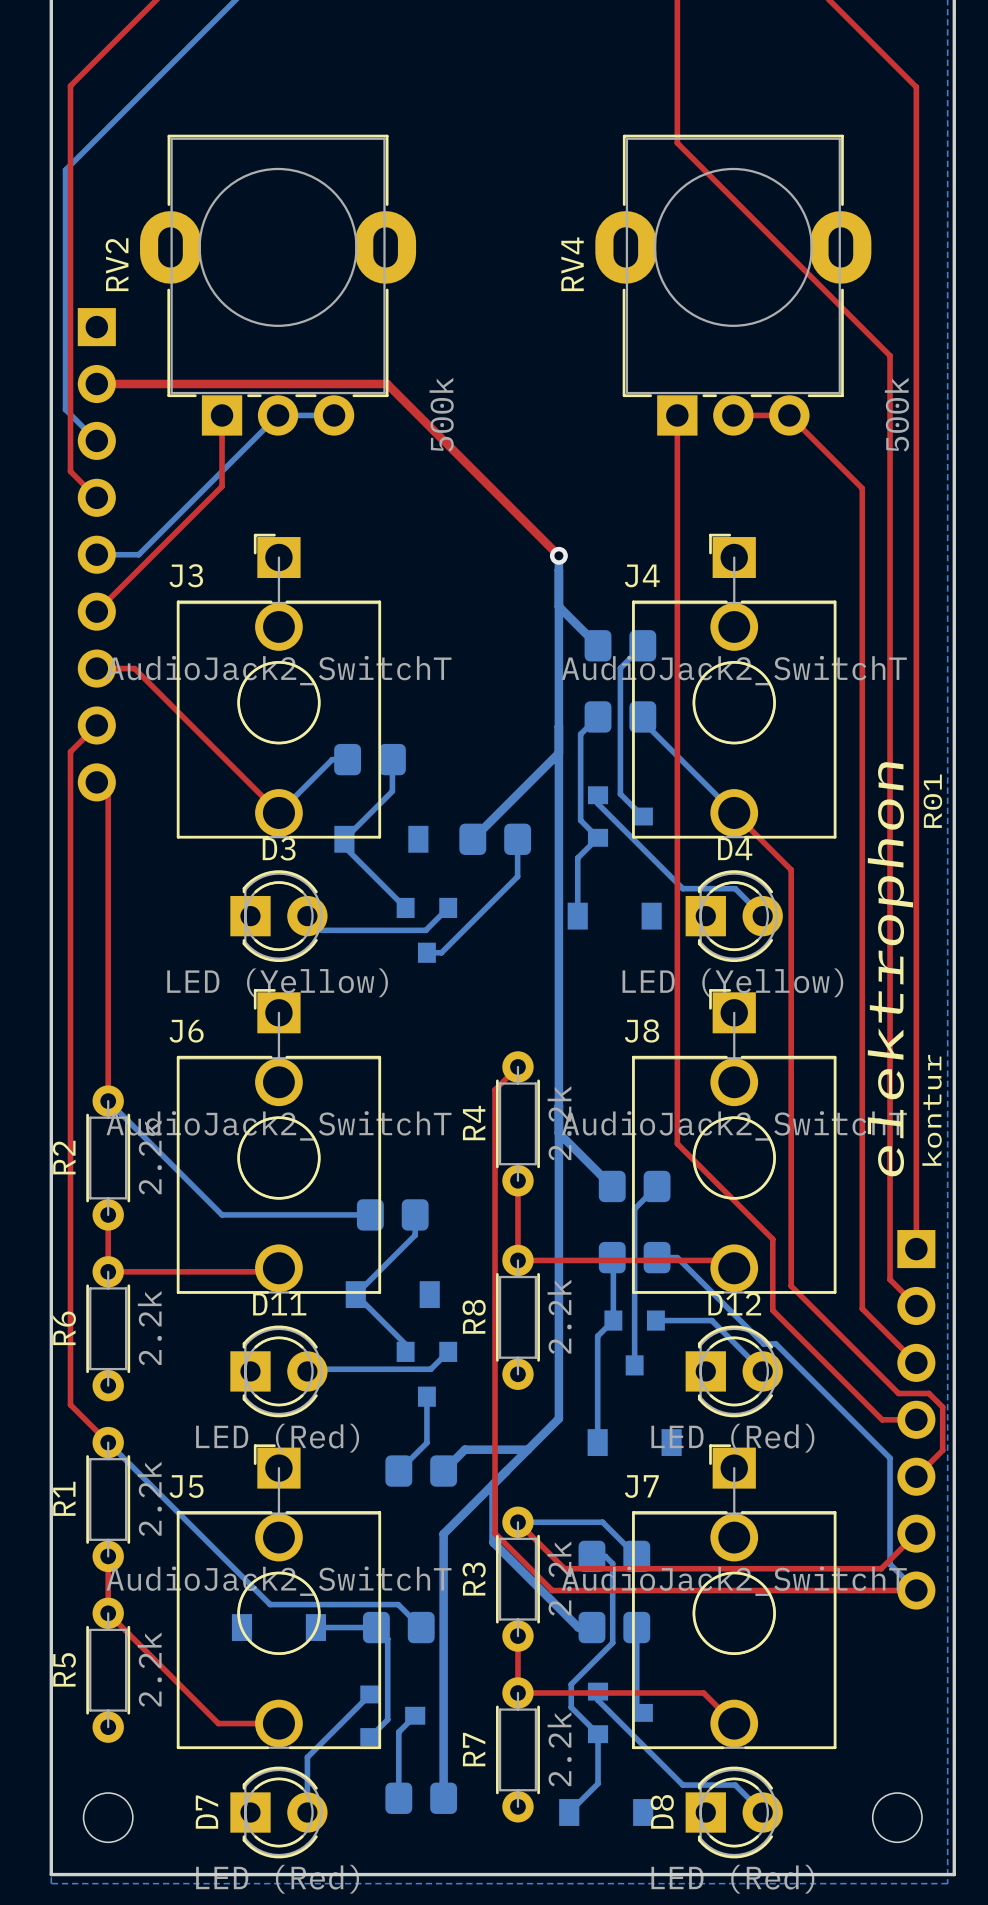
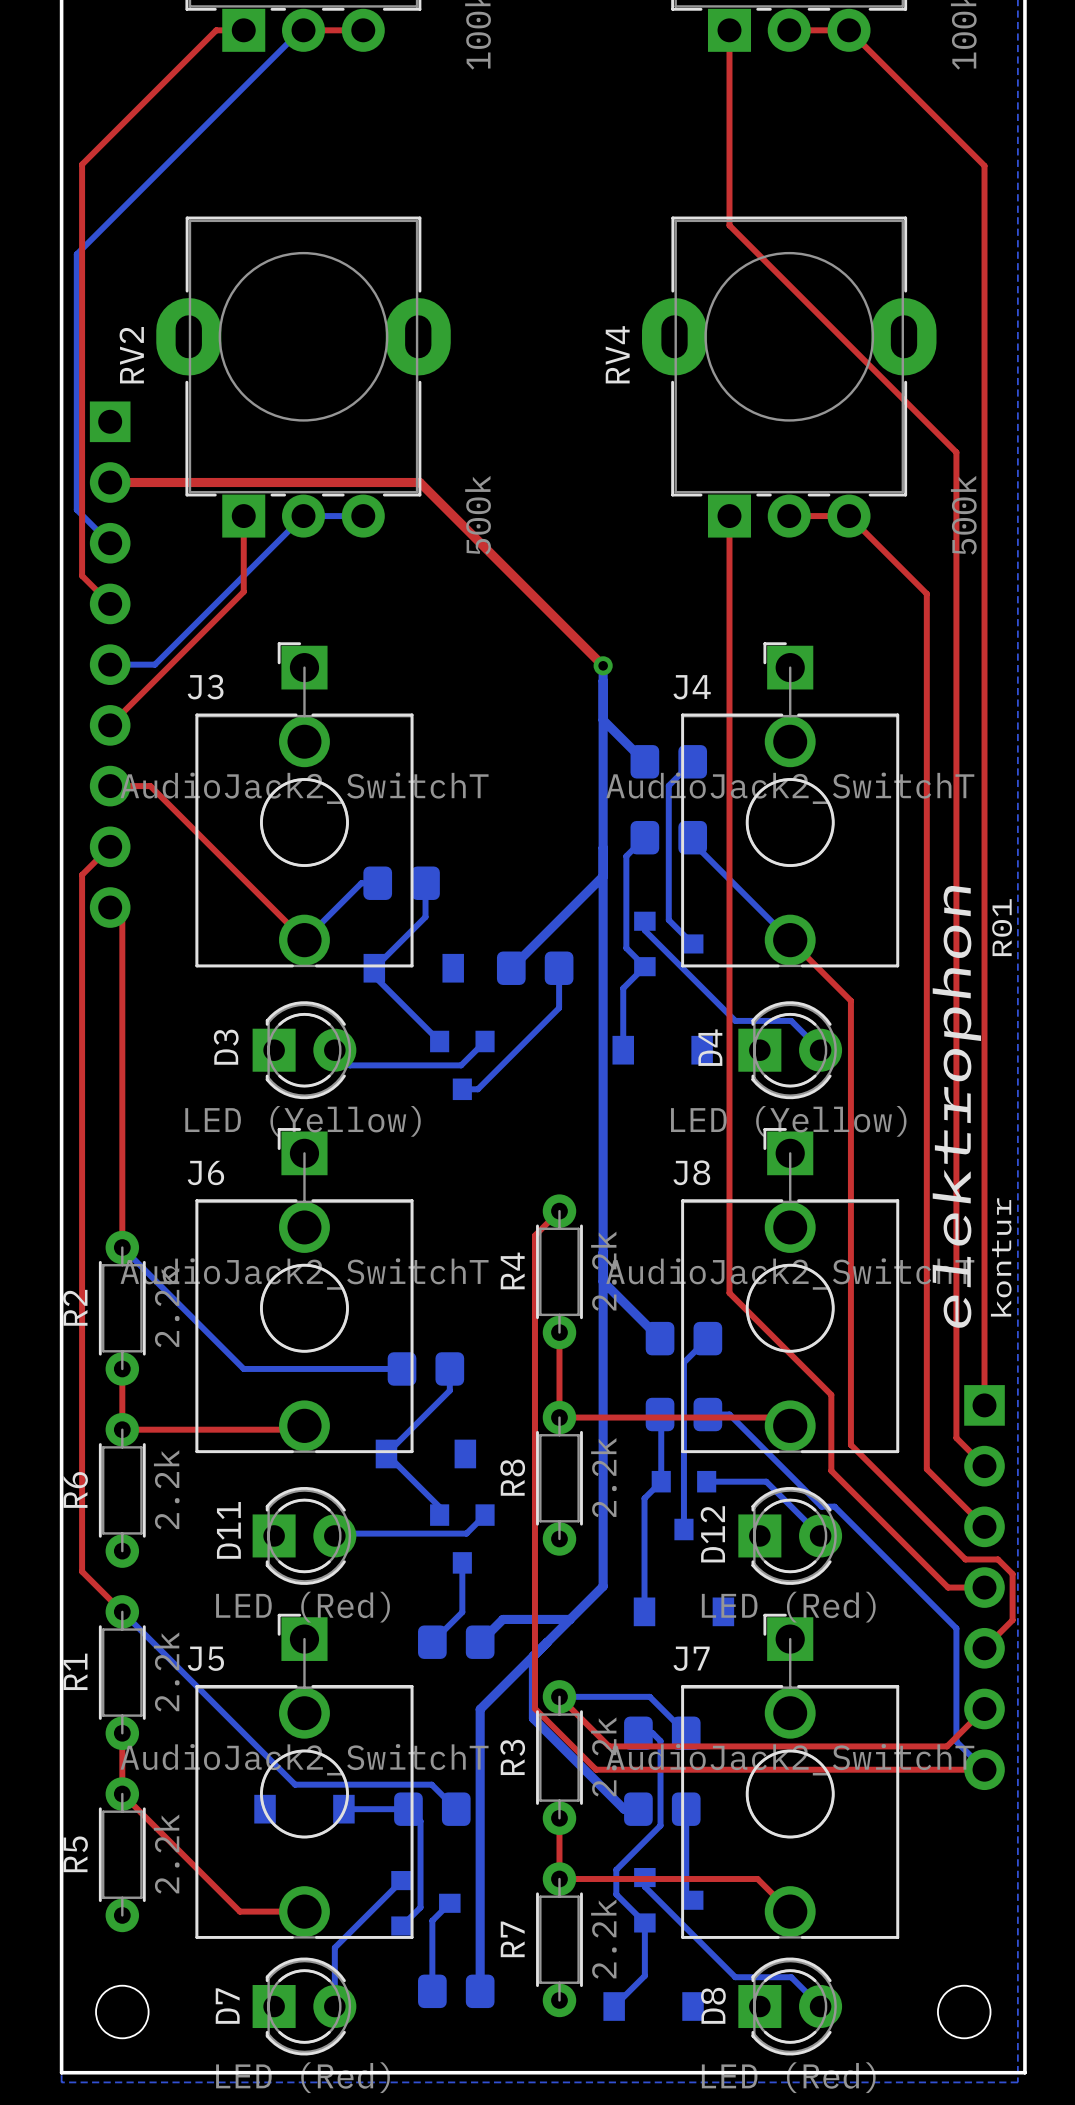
D3 name rotation: 0° (279, 848) -> 90° counterclockwise (226, 1047)
D3 name position: D3 (279, 848) -> D3 (226, 1047)
D4 name rotation: 0° (735, 848) -> 90° counterclockwise (710, 1047)
D4 name position: D4 (735, 848) -> D4 (710, 1047)
D11 name rotation: 0° (279, 1304) -> 90° counterclockwise (228, 1530)
D11 name position: D11 (279, 1304) -> D11 (228, 1530)
D12 name rotation: 0° (734, 1304) -> 90° counterclockwise (712, 1534)
D12 name position: D12 (734, 1304) -> D12 (712, 1534)

